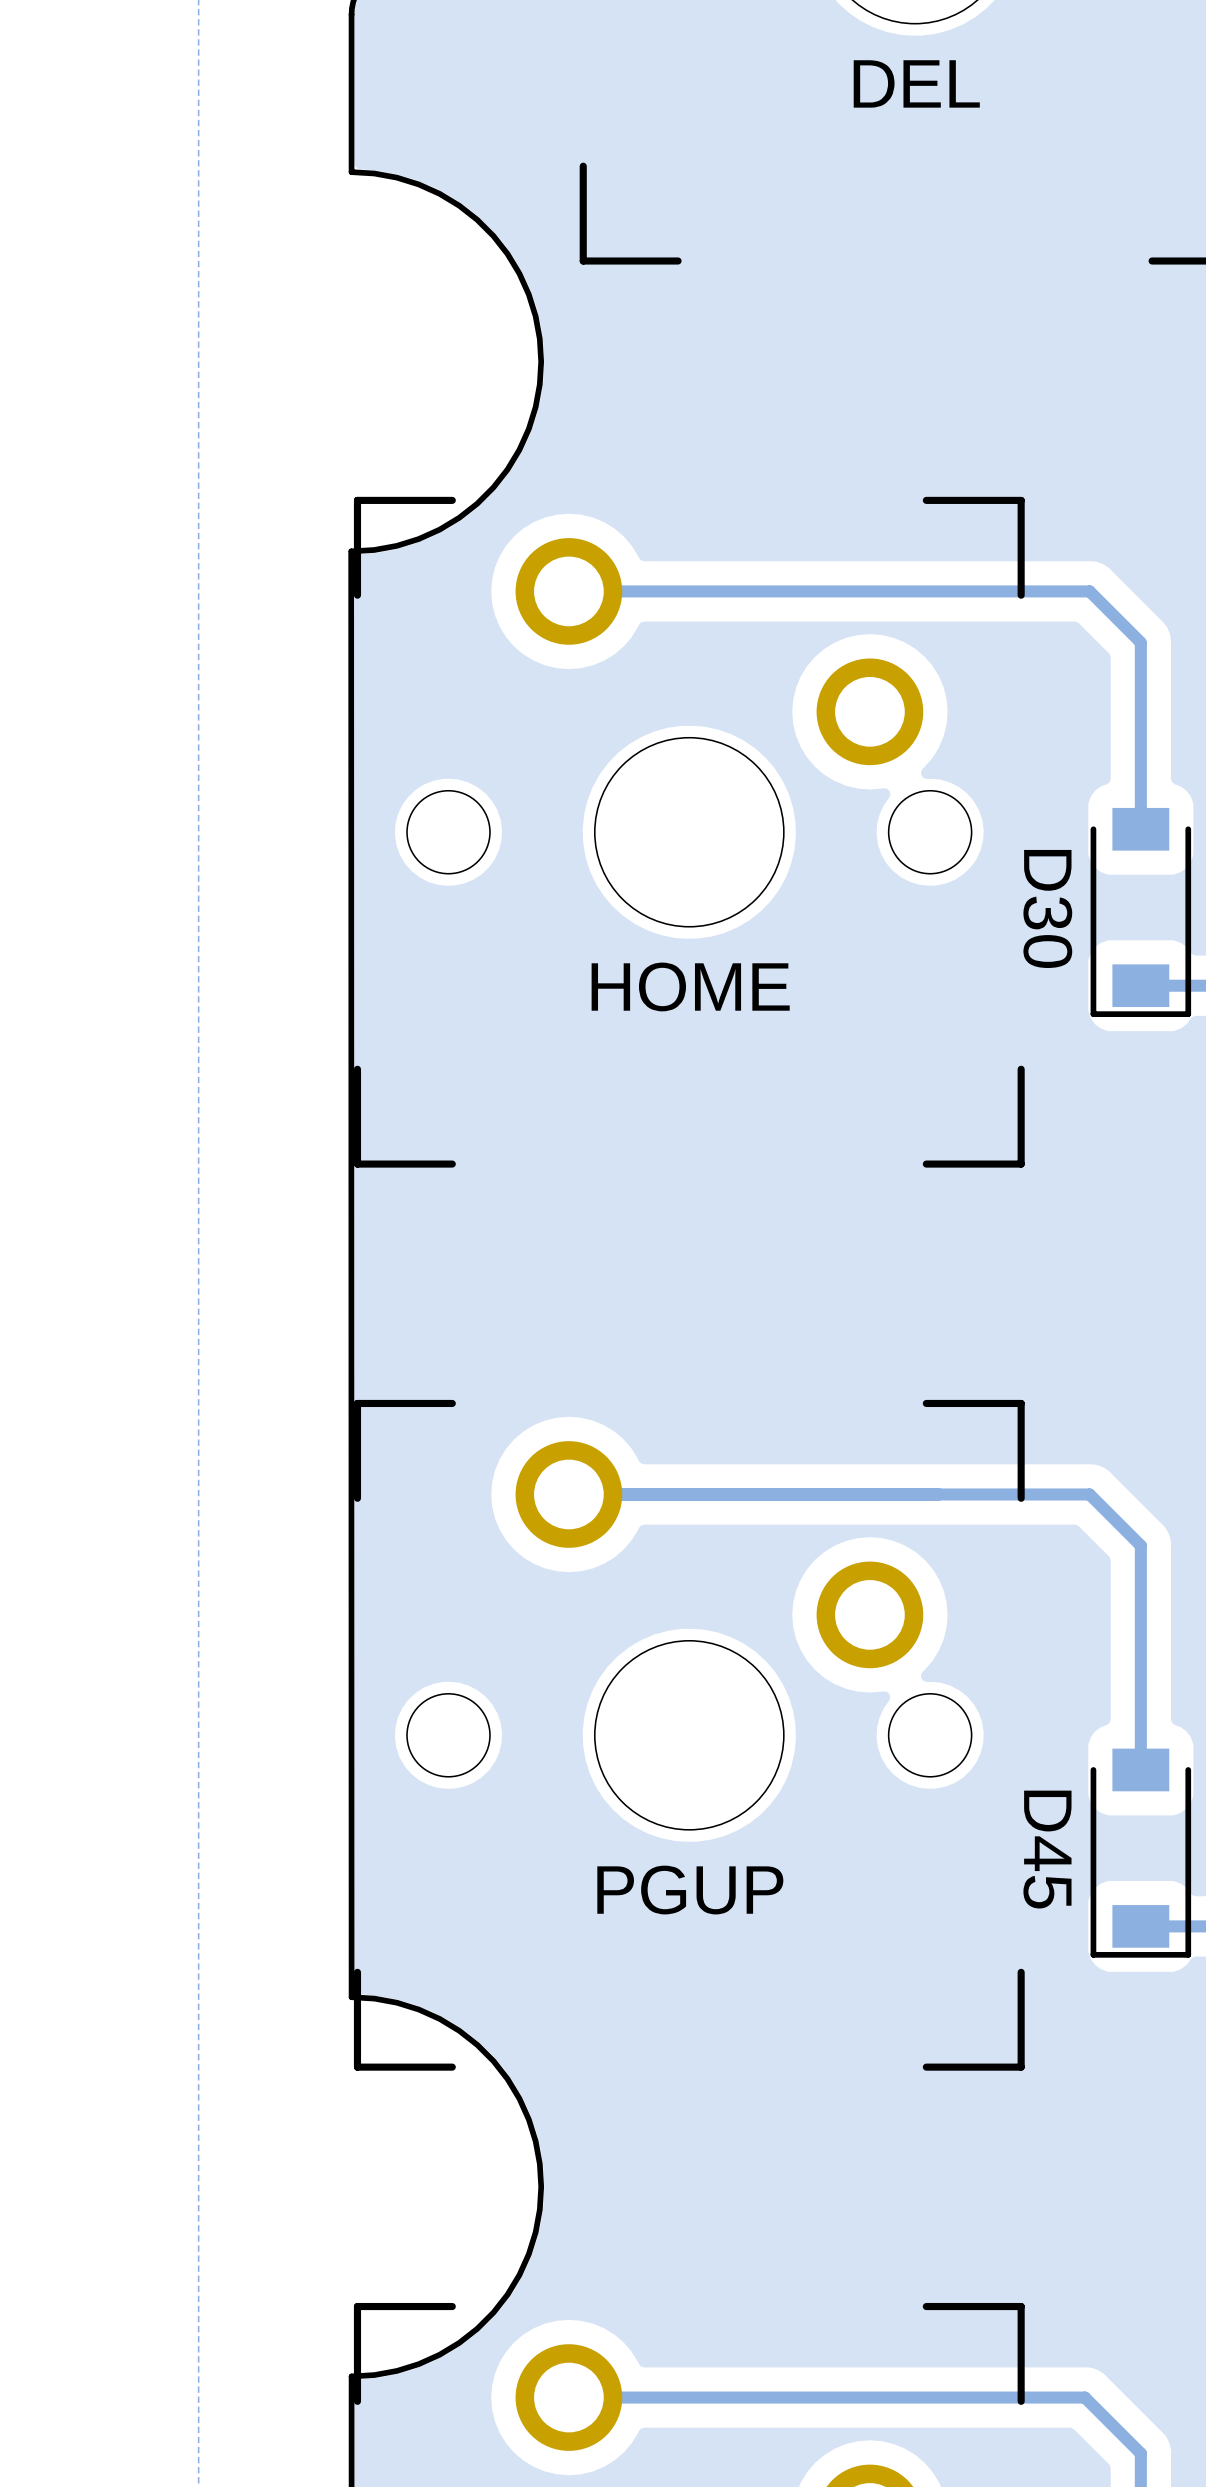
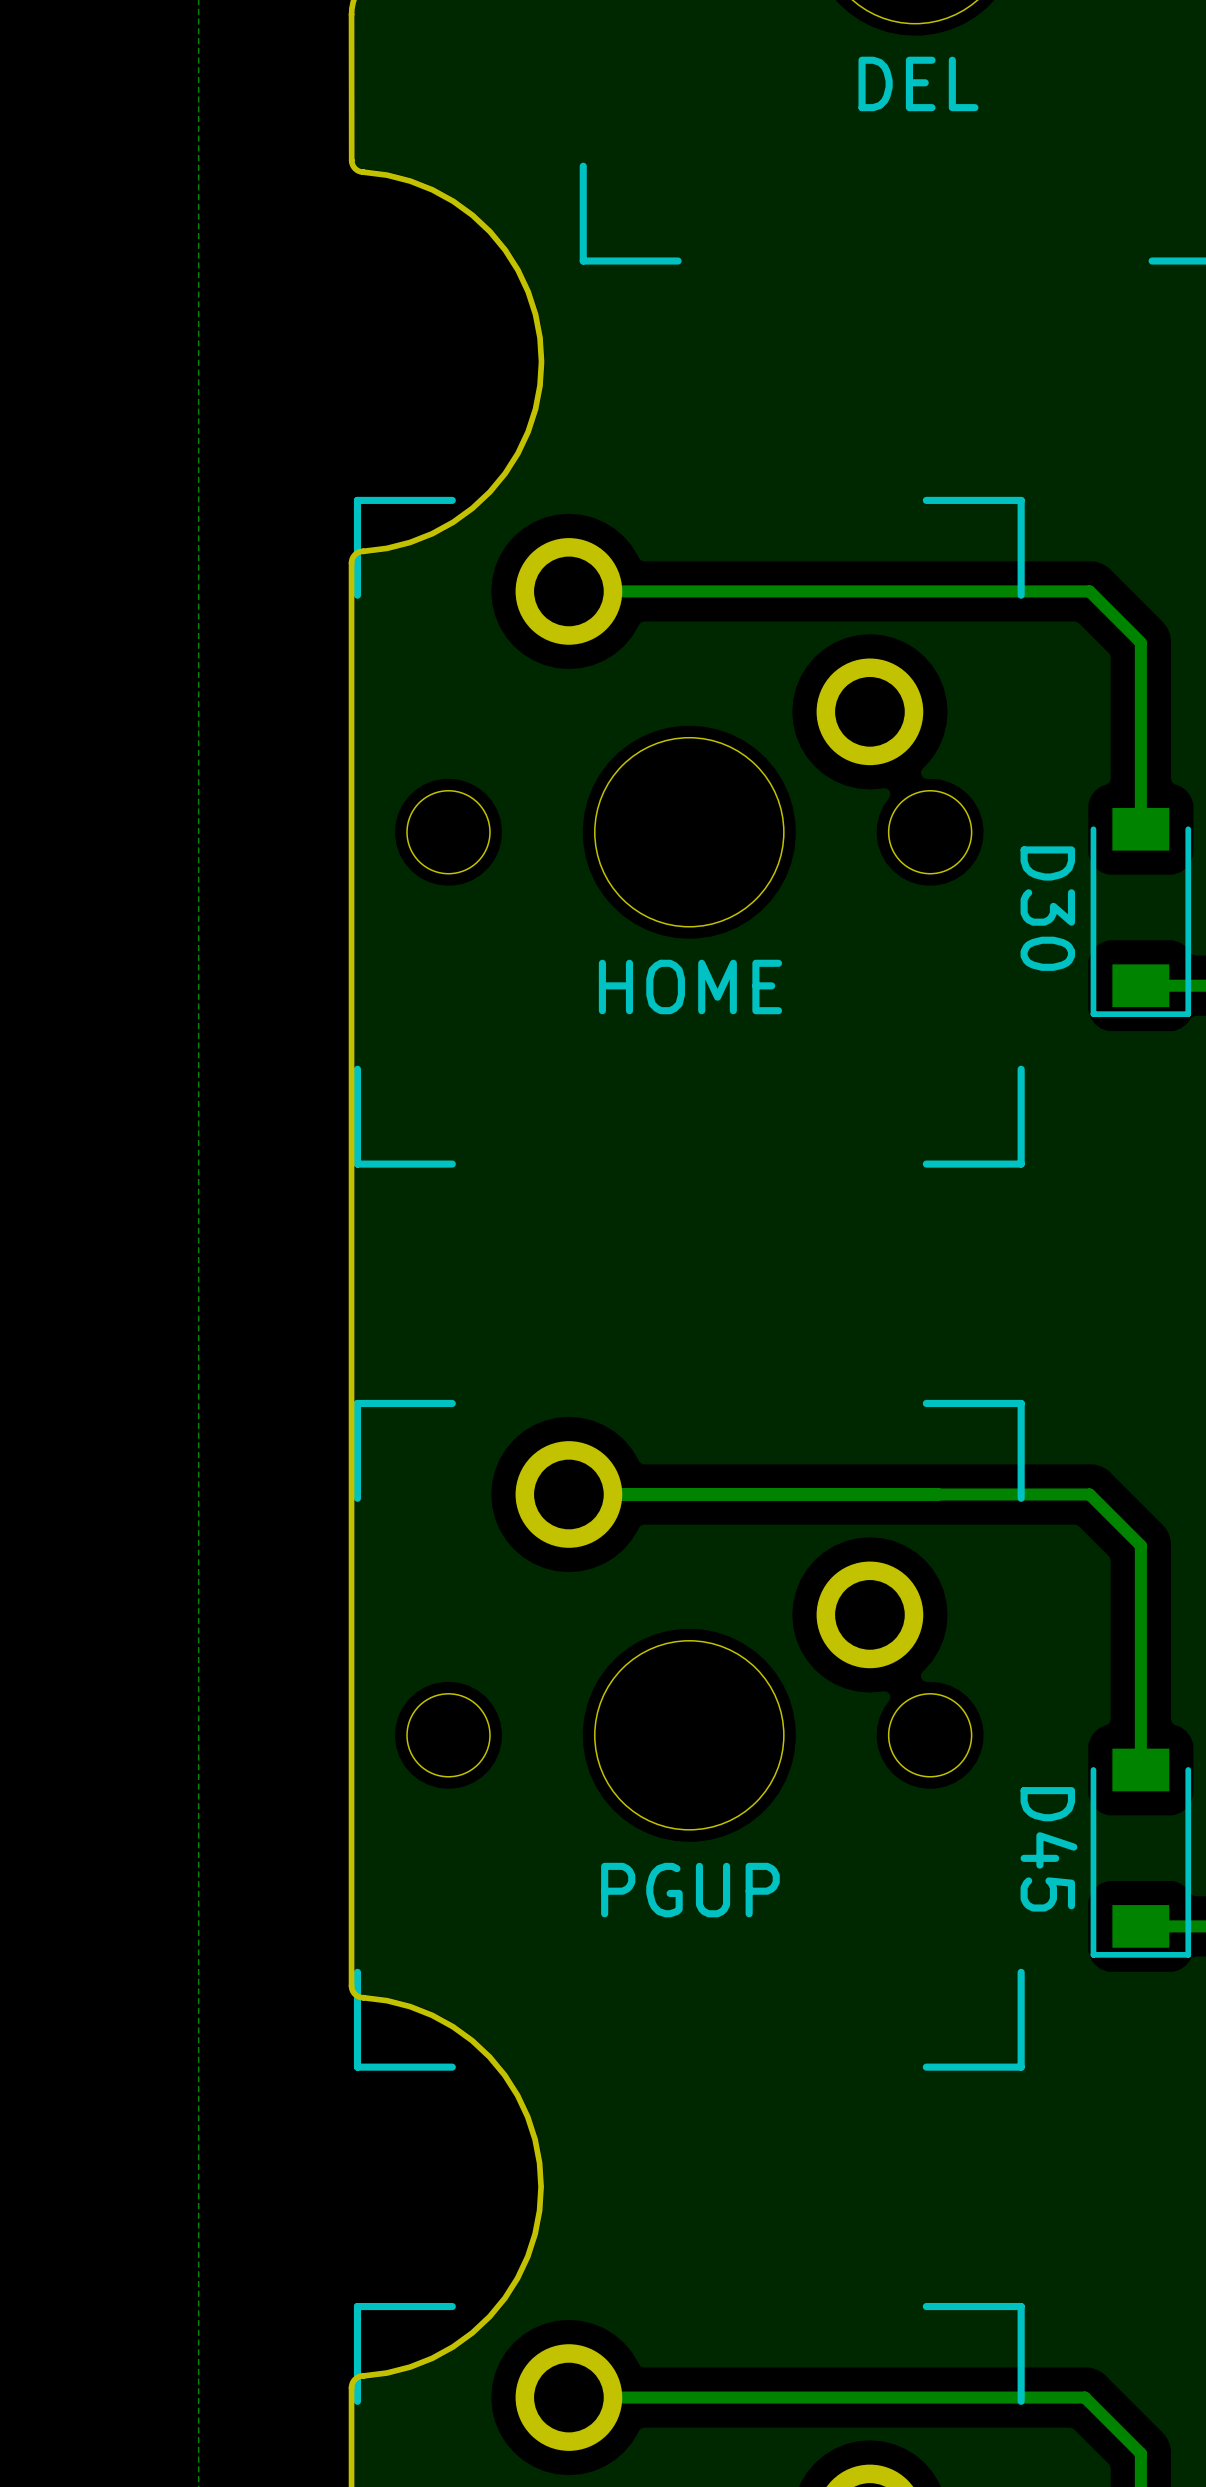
board edge: (351, 14) (351, 172) (374, 173) (418, 184) (439, 193) (477, 219) (507, 254) (528, 294) (535, 316) (541, 361) (535, 407) (528, 428) (507, 469) (477, 503) (439, 529) (418, 539) (374, 549) (351, 551) -> none
board edge: (351, 551) (351, 1997) (374, 1998) (418, 2009) (459, 2030) (477, 2044) (493, 2061) (519, 2098) (535, 2141) (541, 2186) (539, 2209) (528, 2254) (519, 2274) (493, 2312) (459, 2342) (439, 2354) (396, 2370) (351, 2376) (351, 2387) -> (351, 14) (353, 166) (360, 171) (387, 175) (432, 189) (472, 215) (490, 231) (505, 250) (528, 291) (540, 337) (541, 361) (540, 385) (528, 431) (505, 473) (489, 491) (453, 522) (432, 533) (386, 548) (359, 552) (353, 556) (351, 563) (351, 1987) (354, 1993) (359, 1997) (387, 2000) (432, 2015) (472, 2040) (489, 2057) (517, 2095) (535, 2139) (541, 2186) (539, 2210) (527, 2256) (517, 2278) (489, 2316) (472, 2332) (432, 2358) (387, 2373) (359, 2376) (354, 2380) (351, 2387)

